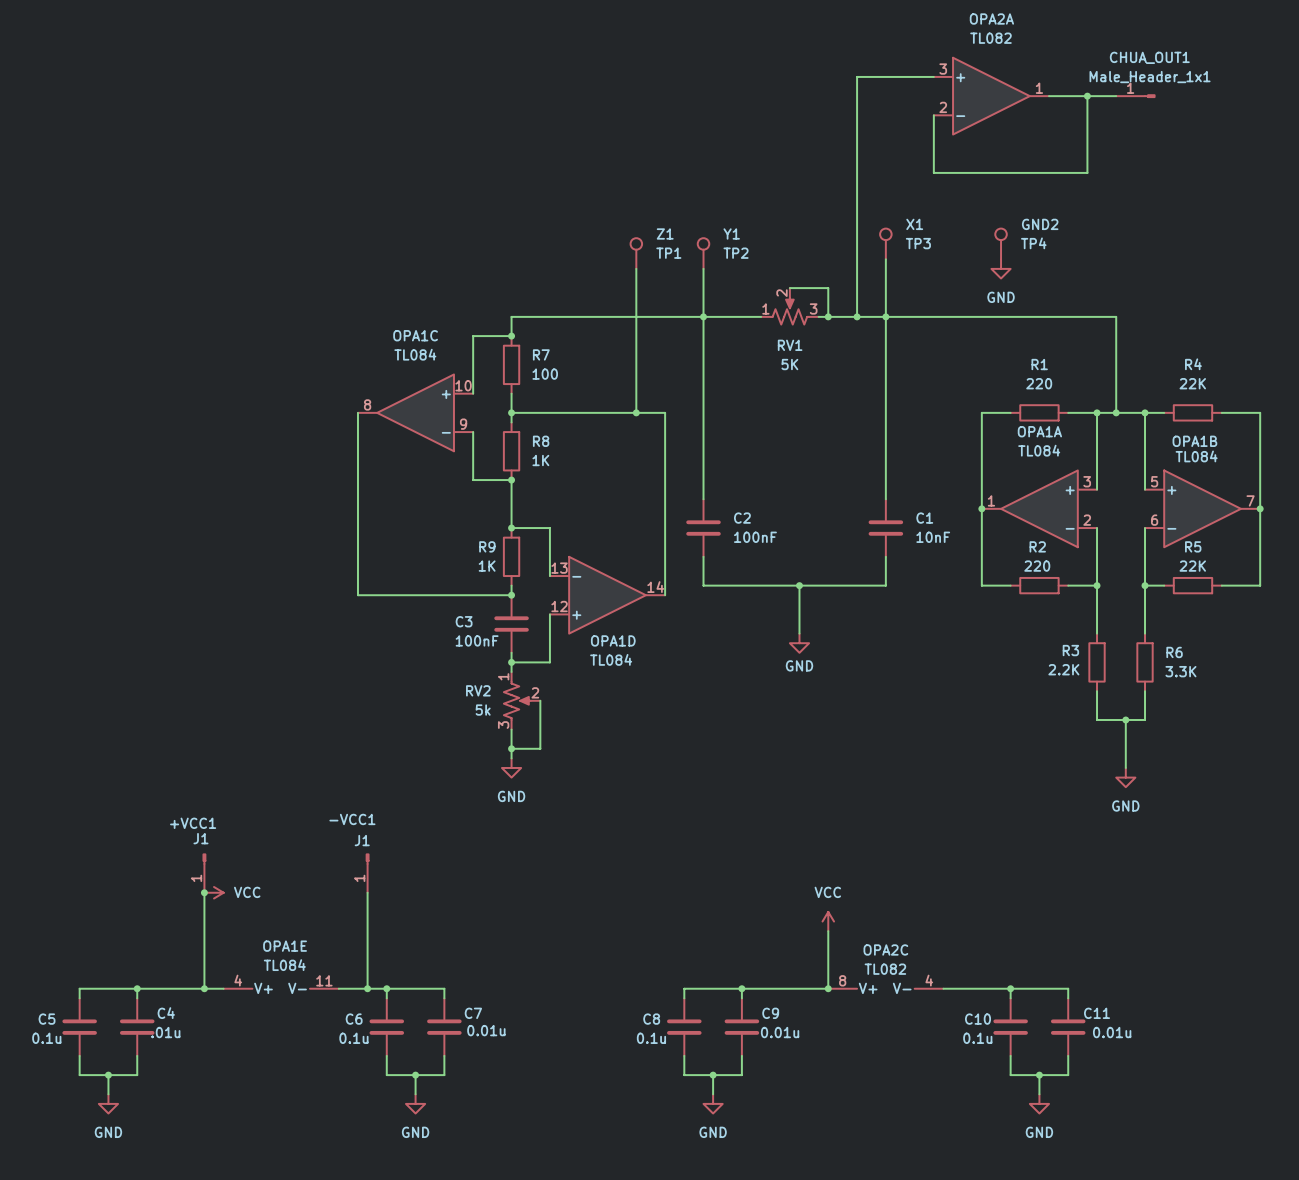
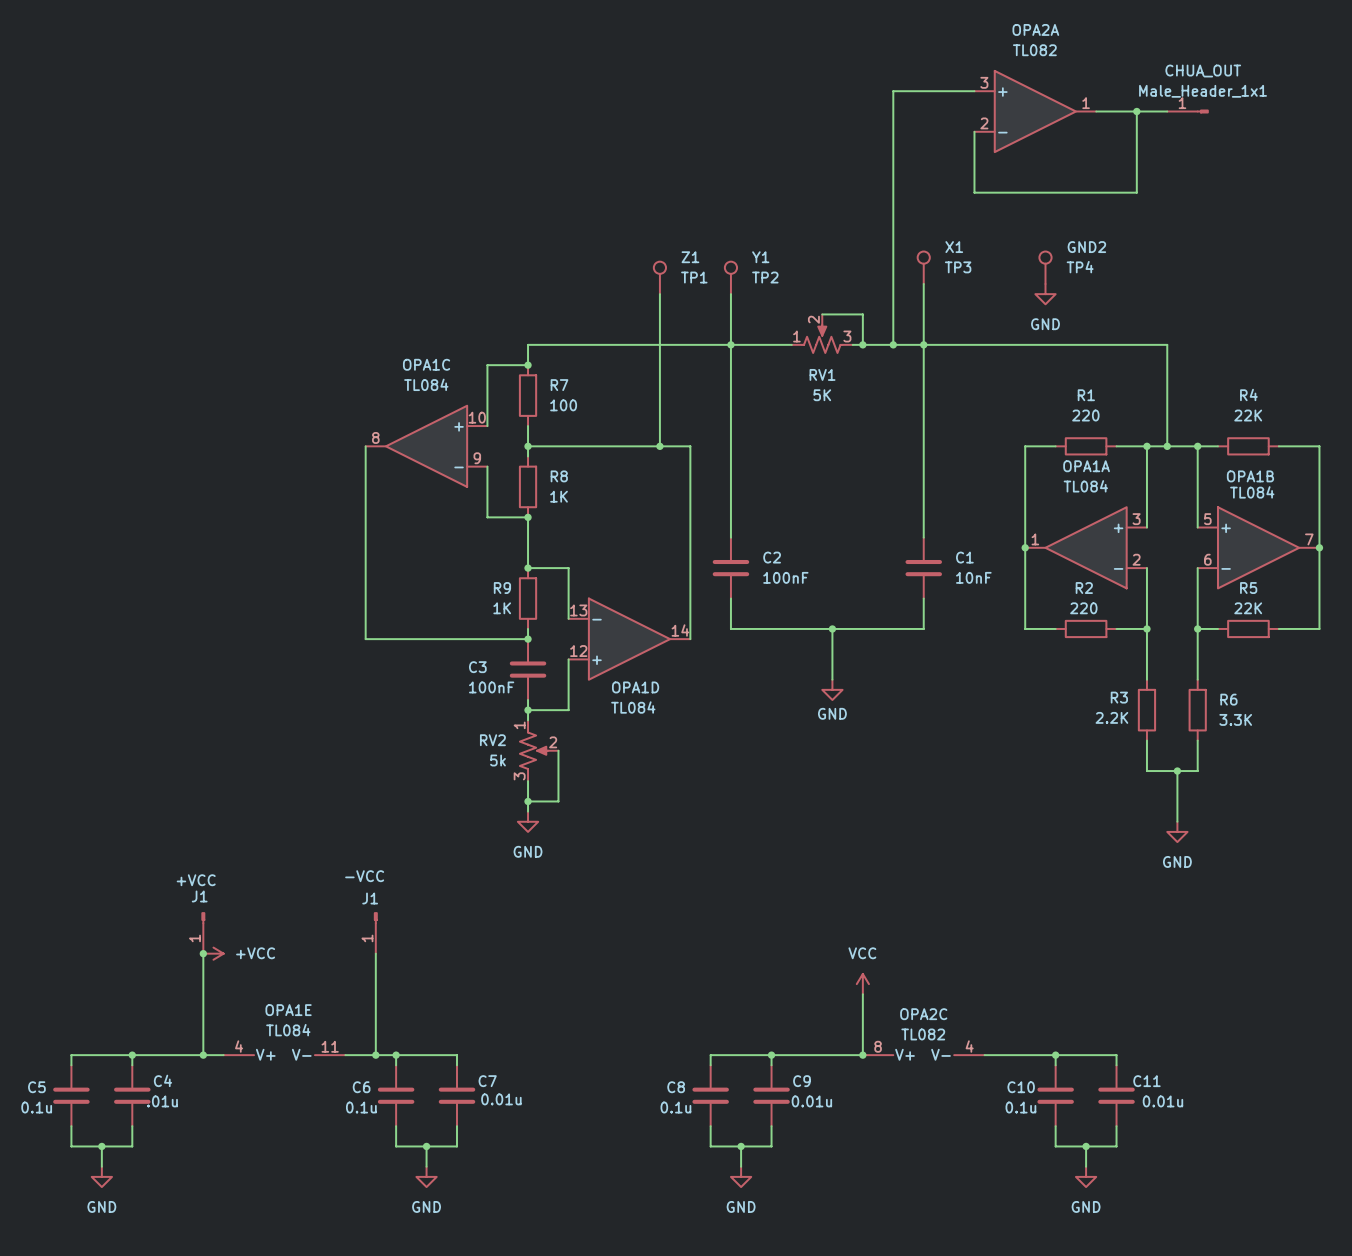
CHUA_OUT1 name: CHUA_OUT1 (1149, 57) -> CHUA_OUT (1203, 71)
-VCC1 name: -VCC1 (352, 819) -> -VCC (364, 876)
+VCC1 name: +VCC1 (193, 823) -> +VCC (196, 880)
power symbol: VCC (214, 892) -> +VCC (213, 953)

